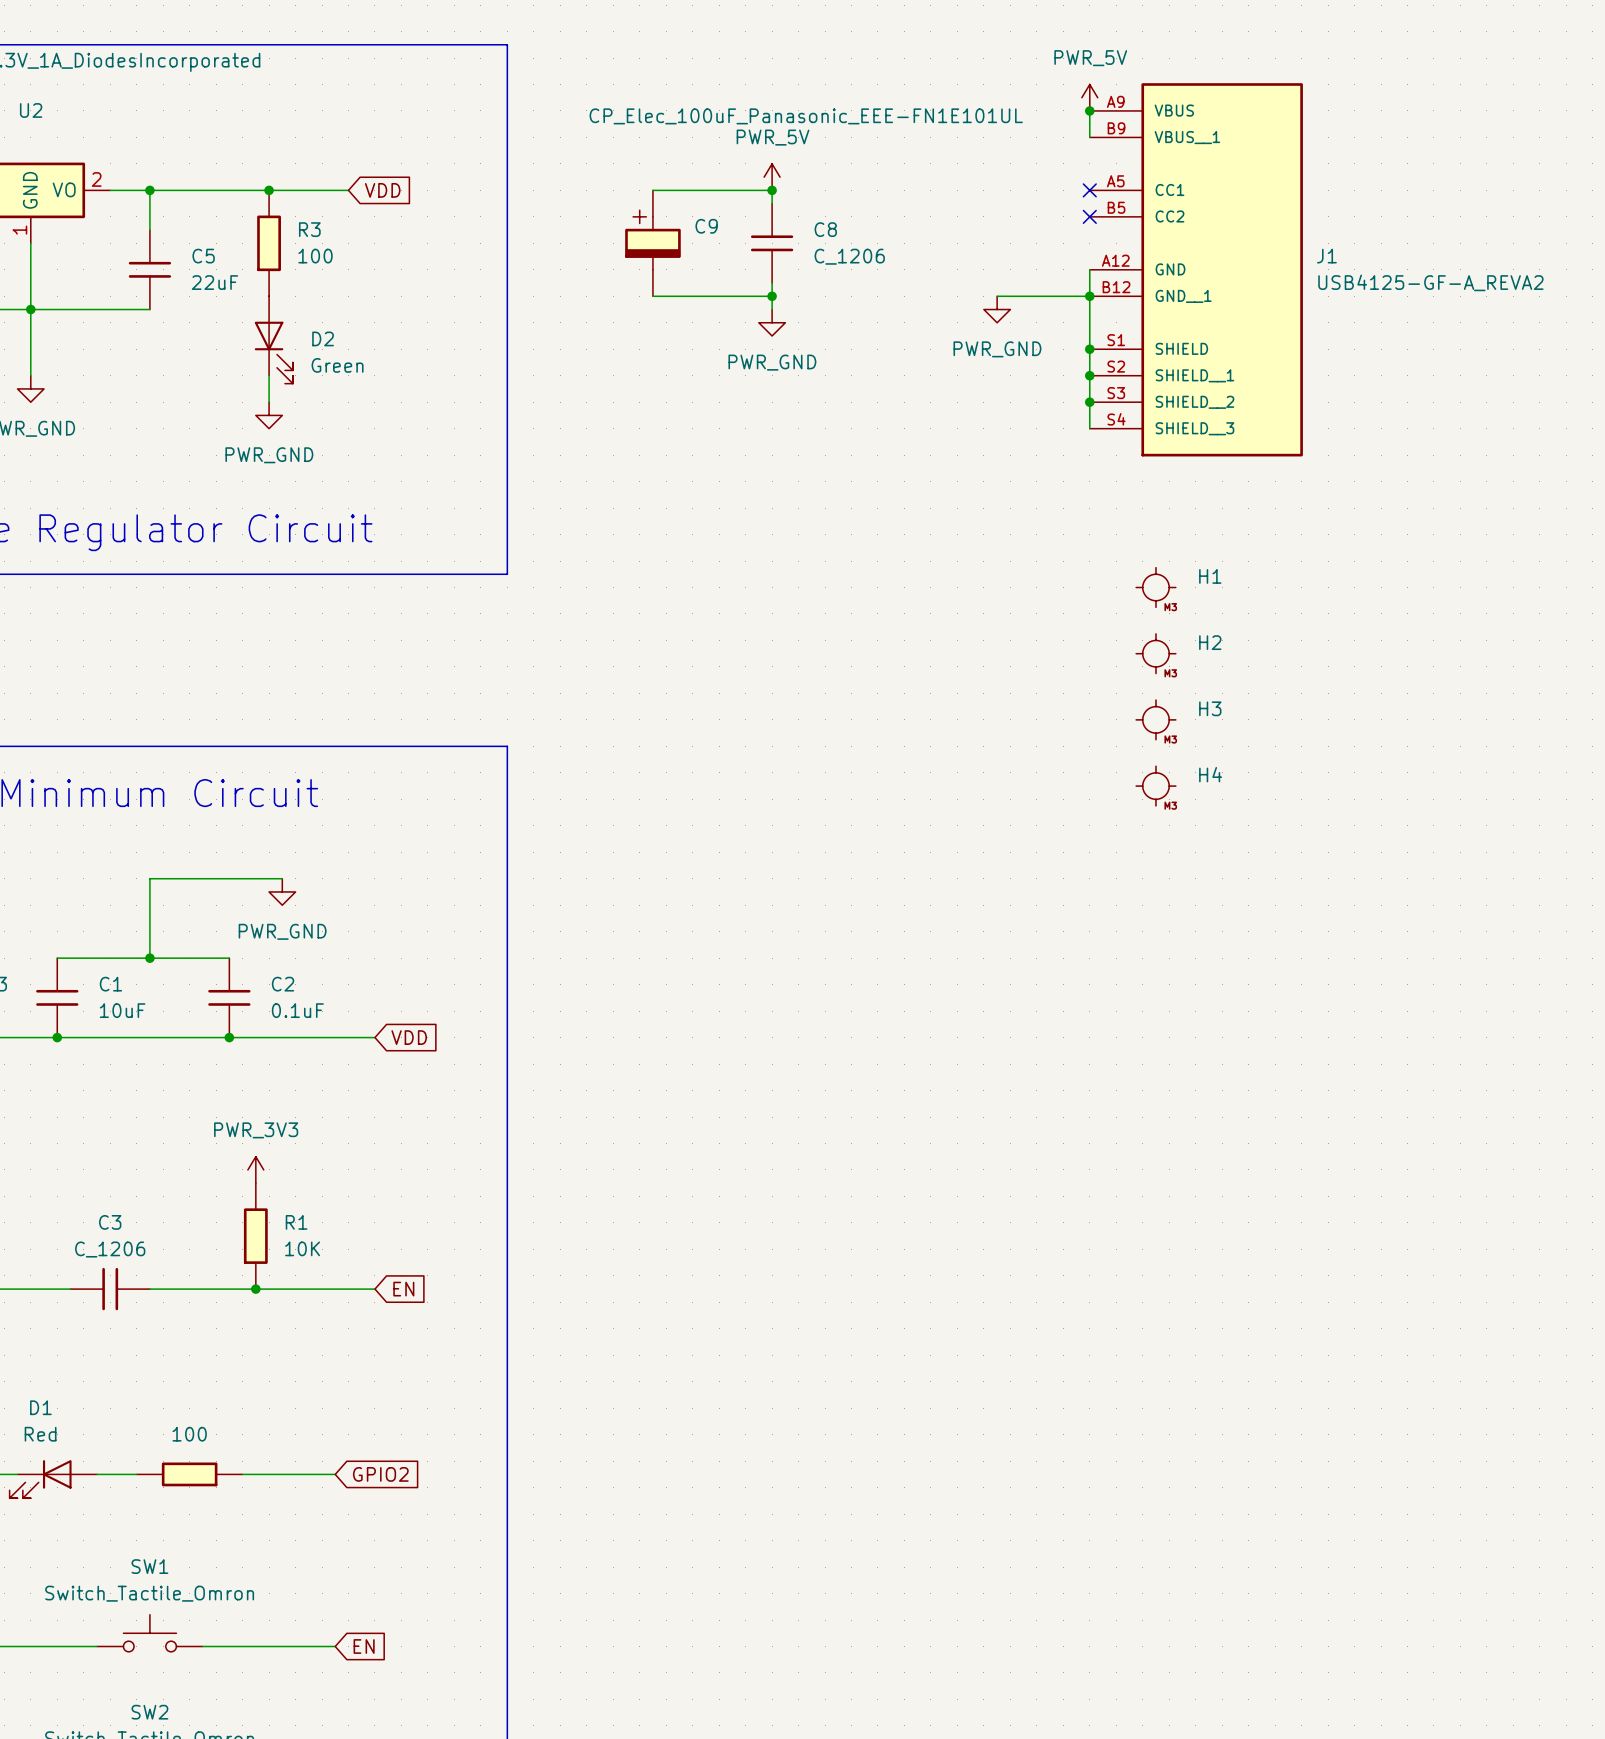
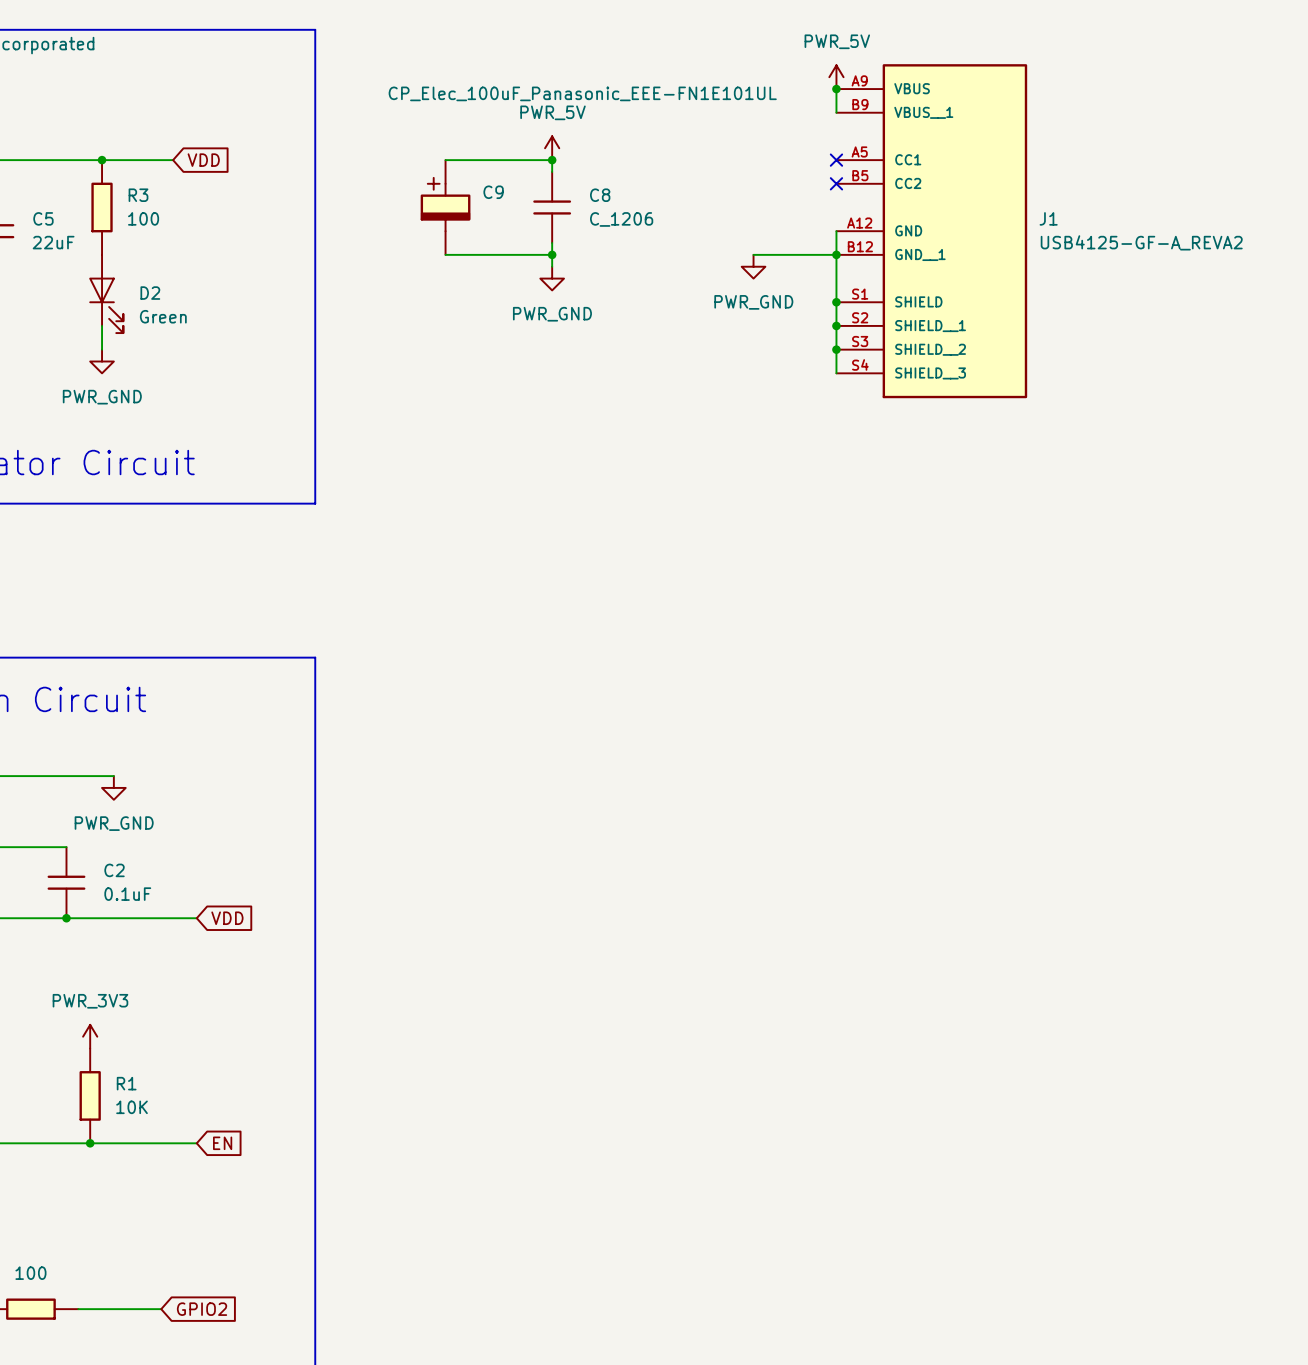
H1: (1155, 587) -> none
H2: (1155, 653) -> none
H3: (1155, 719) -> none
H4: (1155, 786) -> none

